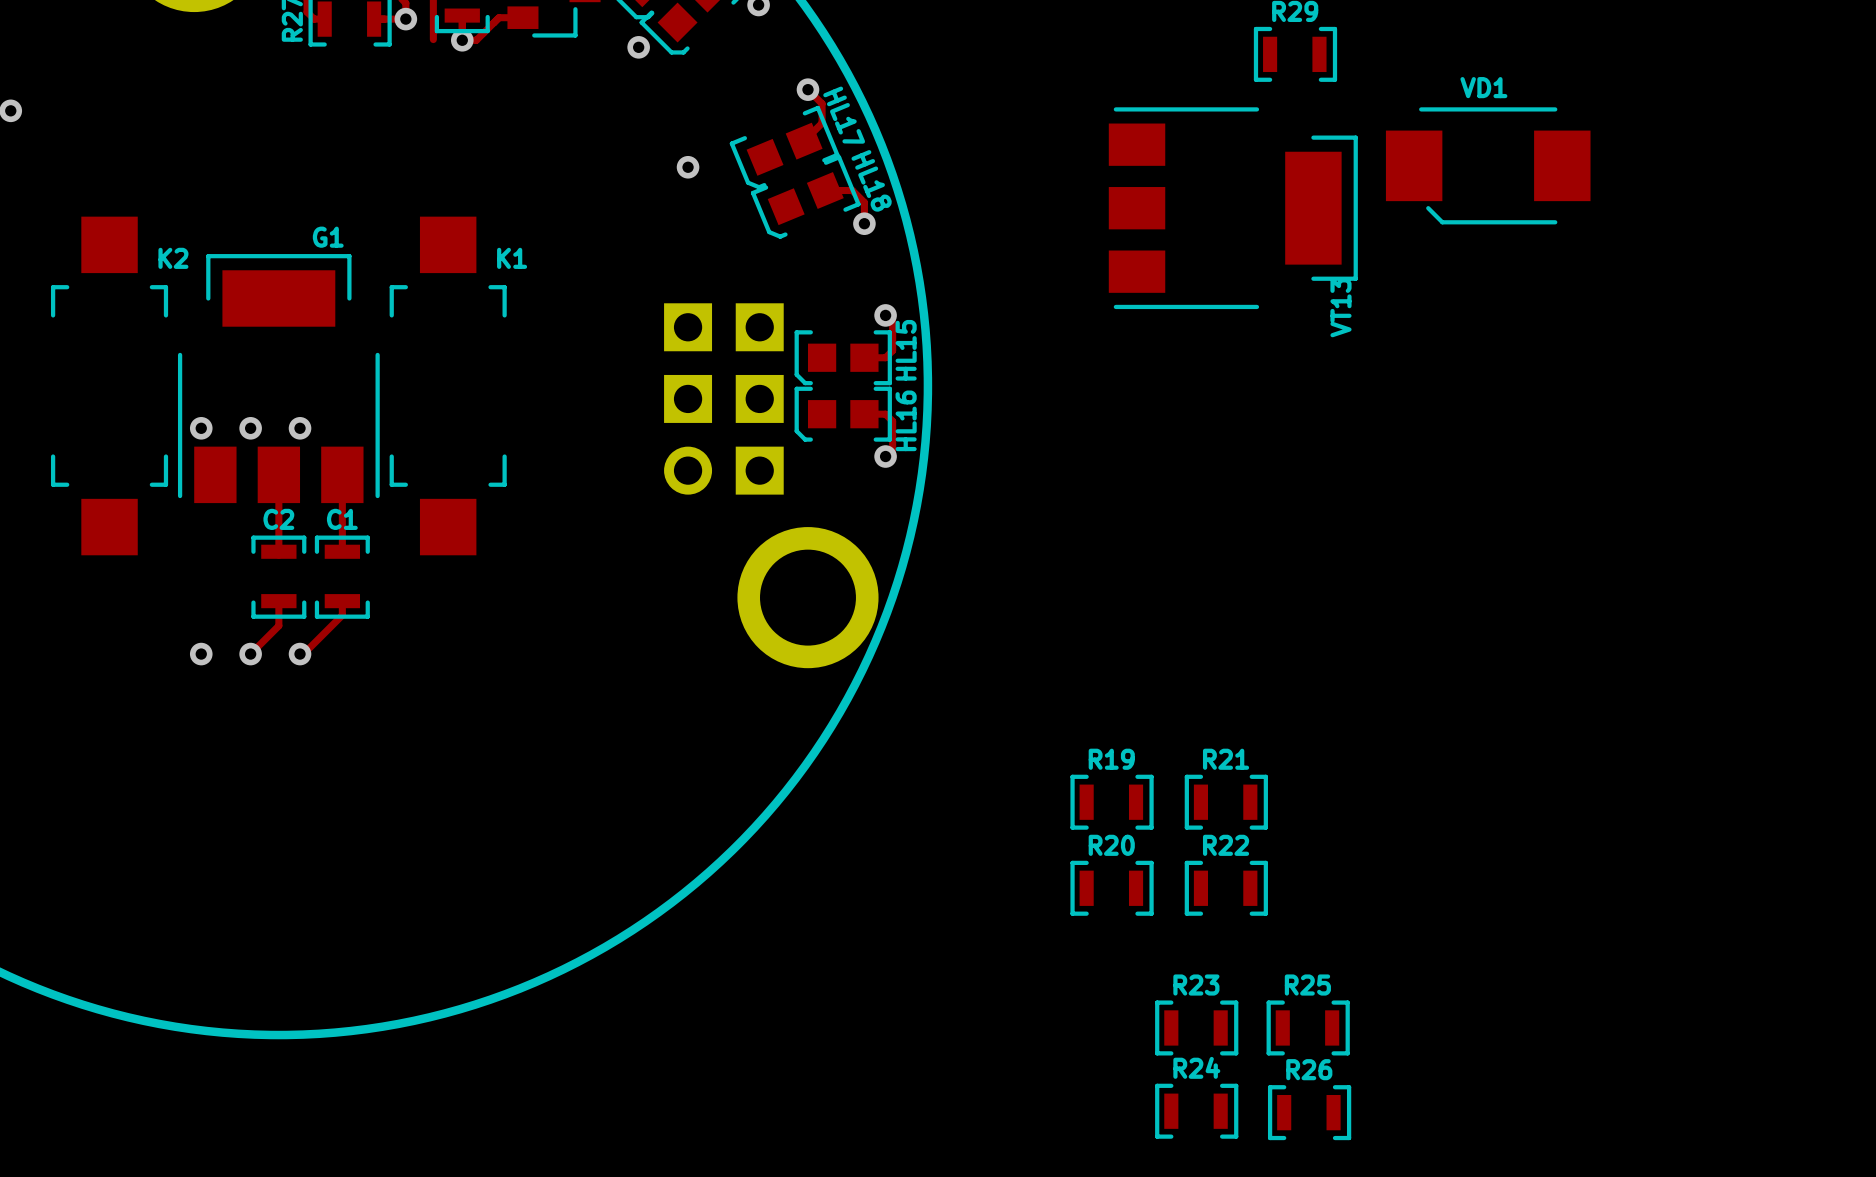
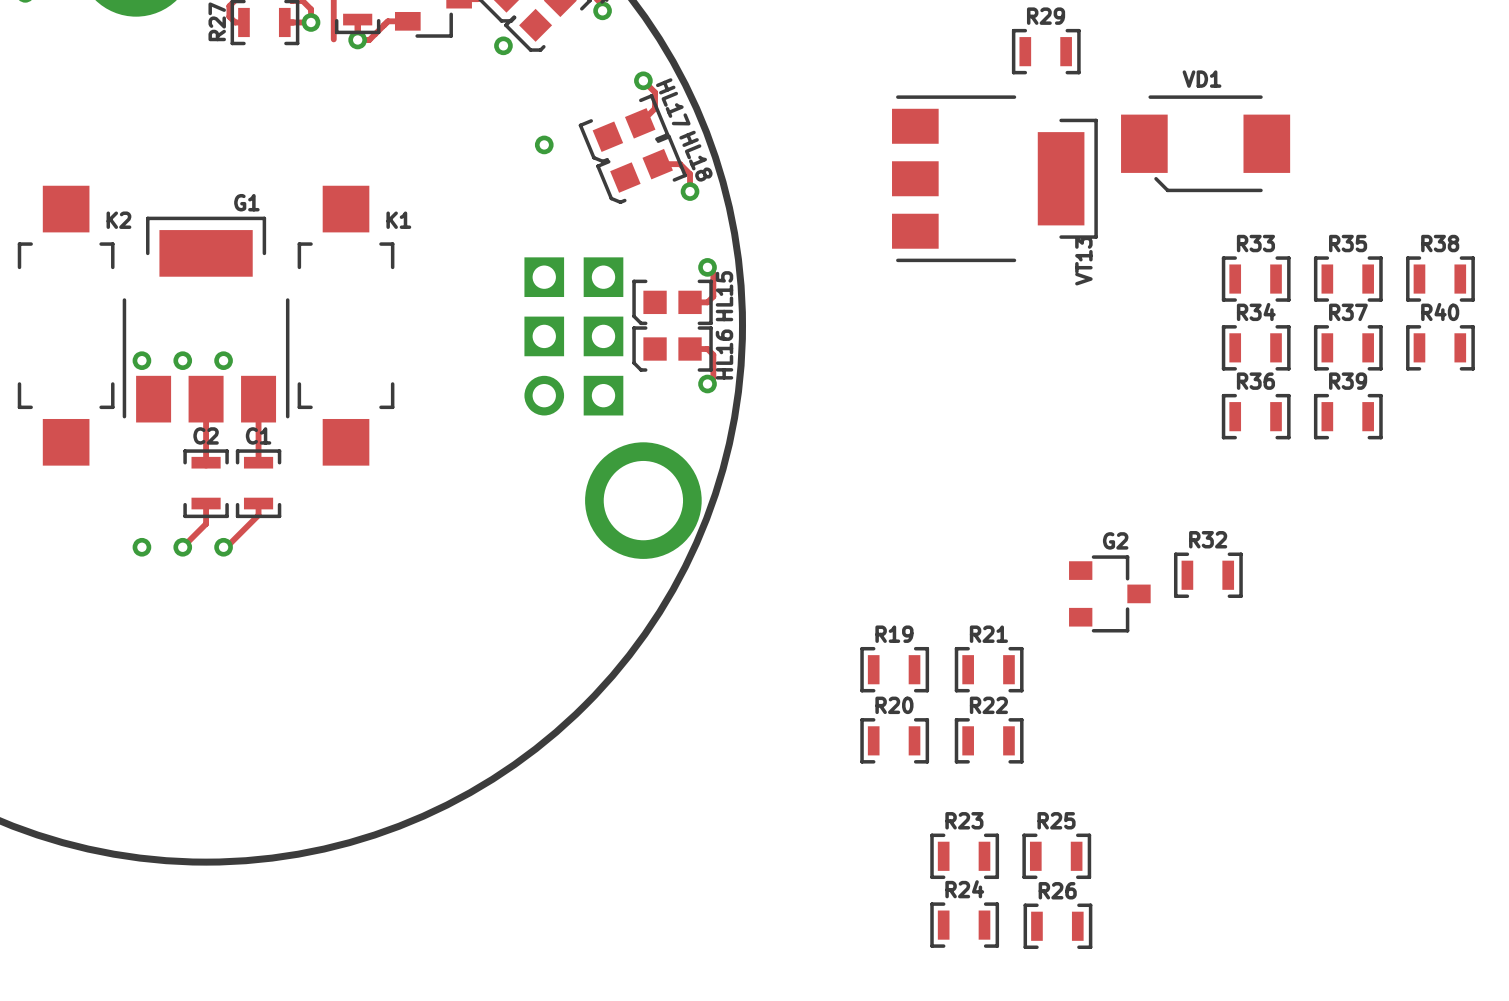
R33: none -> (1256, 279)
R35: none -> (1348, 279)
R38: none -> (1440, 279)
R34: none -> (1256, 347)
R37: none -> (1348, 347)
R40: none -> (1440, 347)
R36: none -> (1256, 416)
R39: none -> (1348, 416)
R32: none -> (1208, 575)
G2: none -> (1109, 593)

